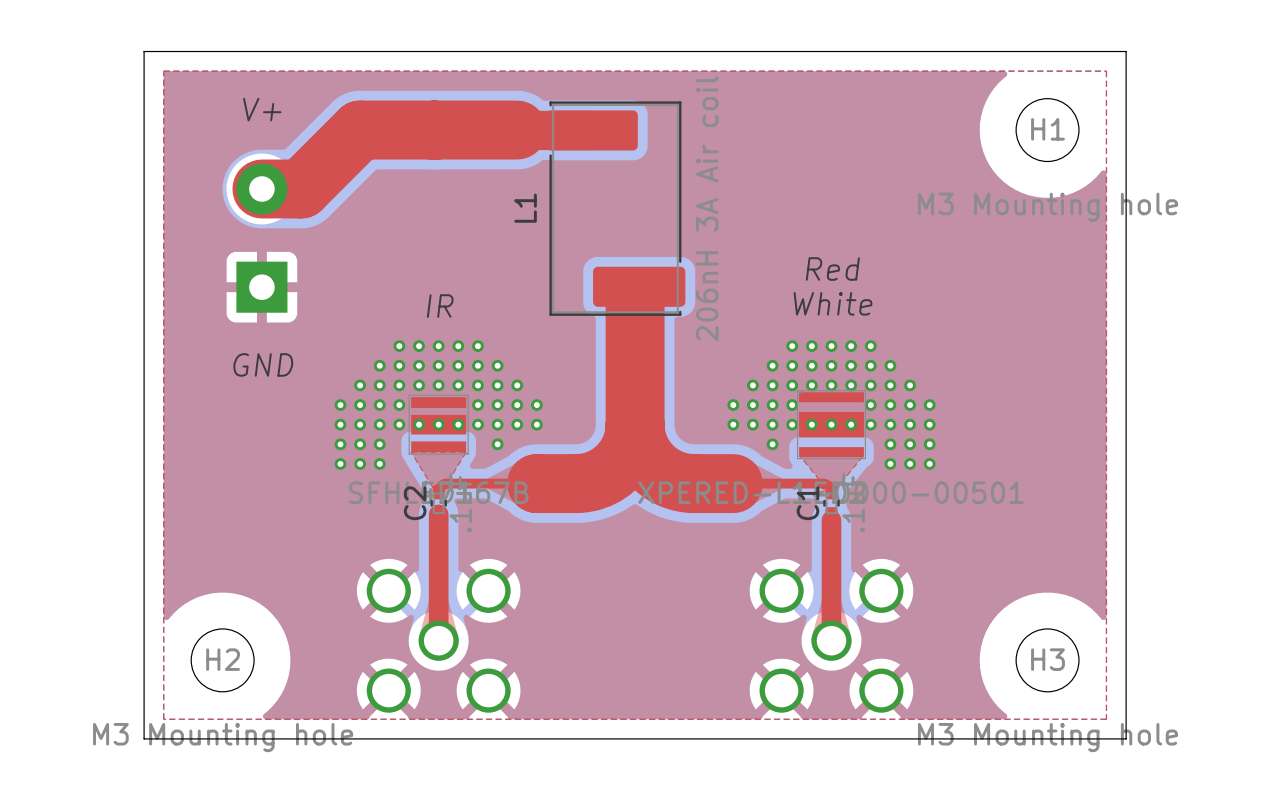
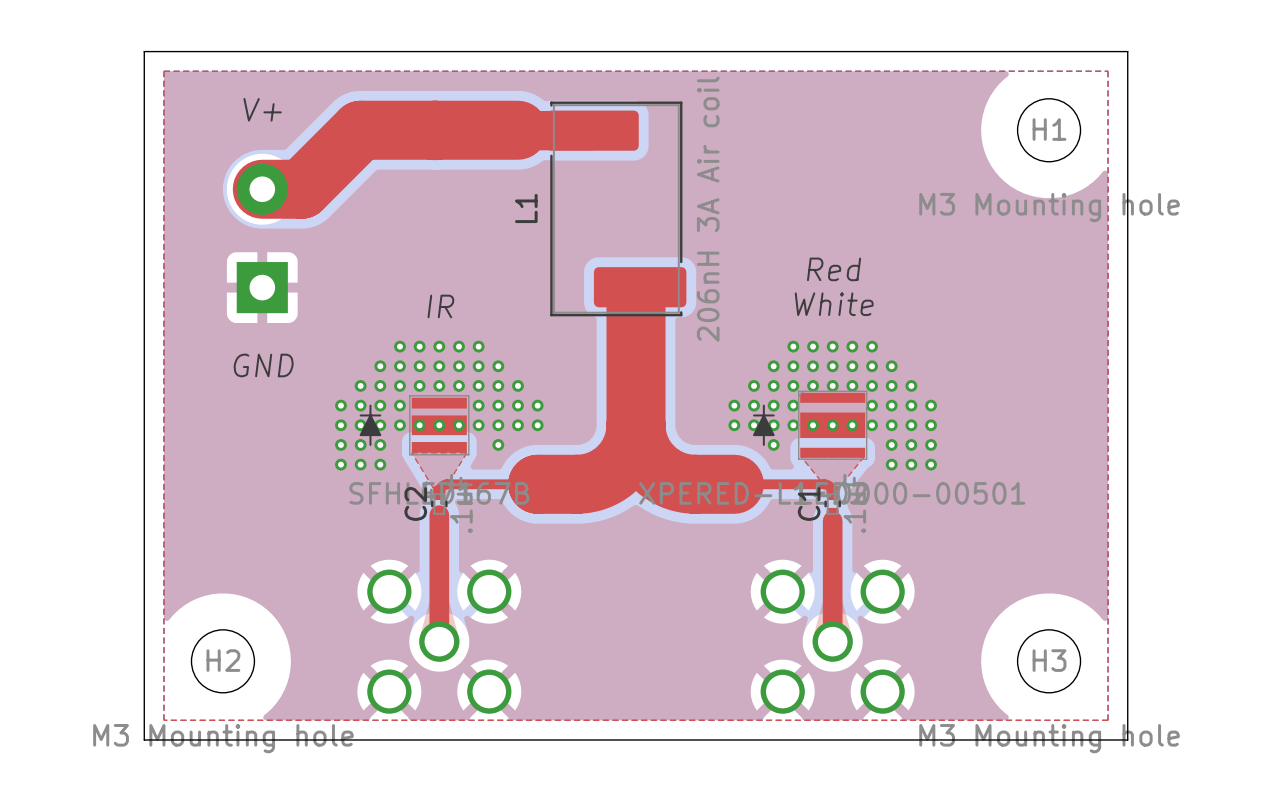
part footprint: [797, 390, 866, 459] -> [753, 391, 867, 460]
part footprint: [408, 394, 469, 455] -> [359, 395, 470, 456]

